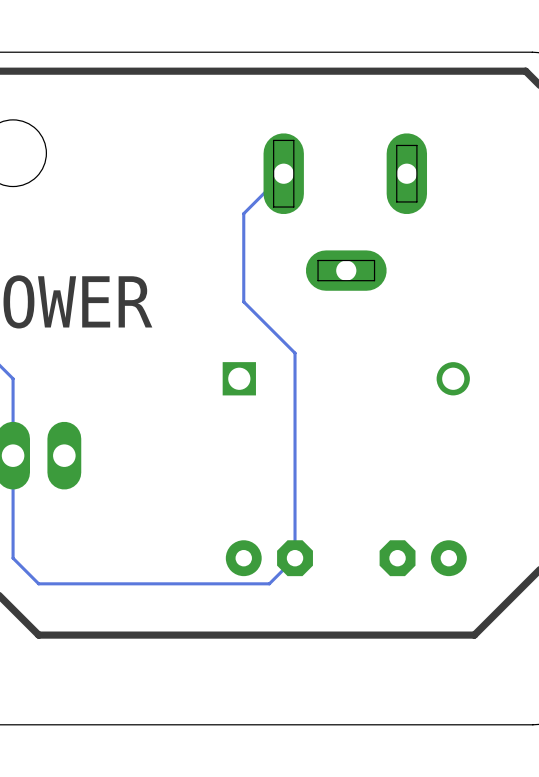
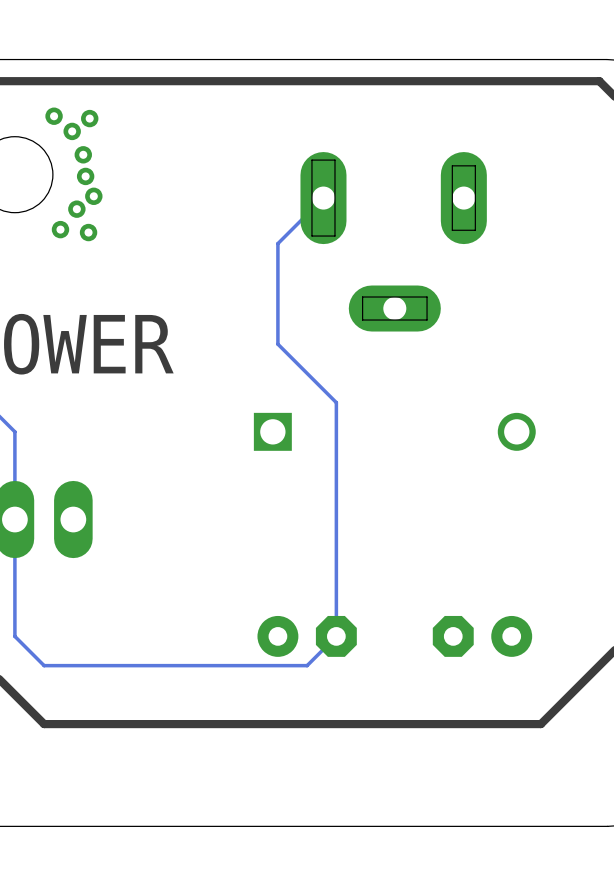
via: none -> (54, 116)
via: none -> (89, 118)
via: none -> (72, 131)
via: none -> (83, 154)
via: none -> (85, 176)
via: none -> (93, 196)
via: none -> (76, 209)
via: none -> (60, 229)
via: none -> (88, 232)

